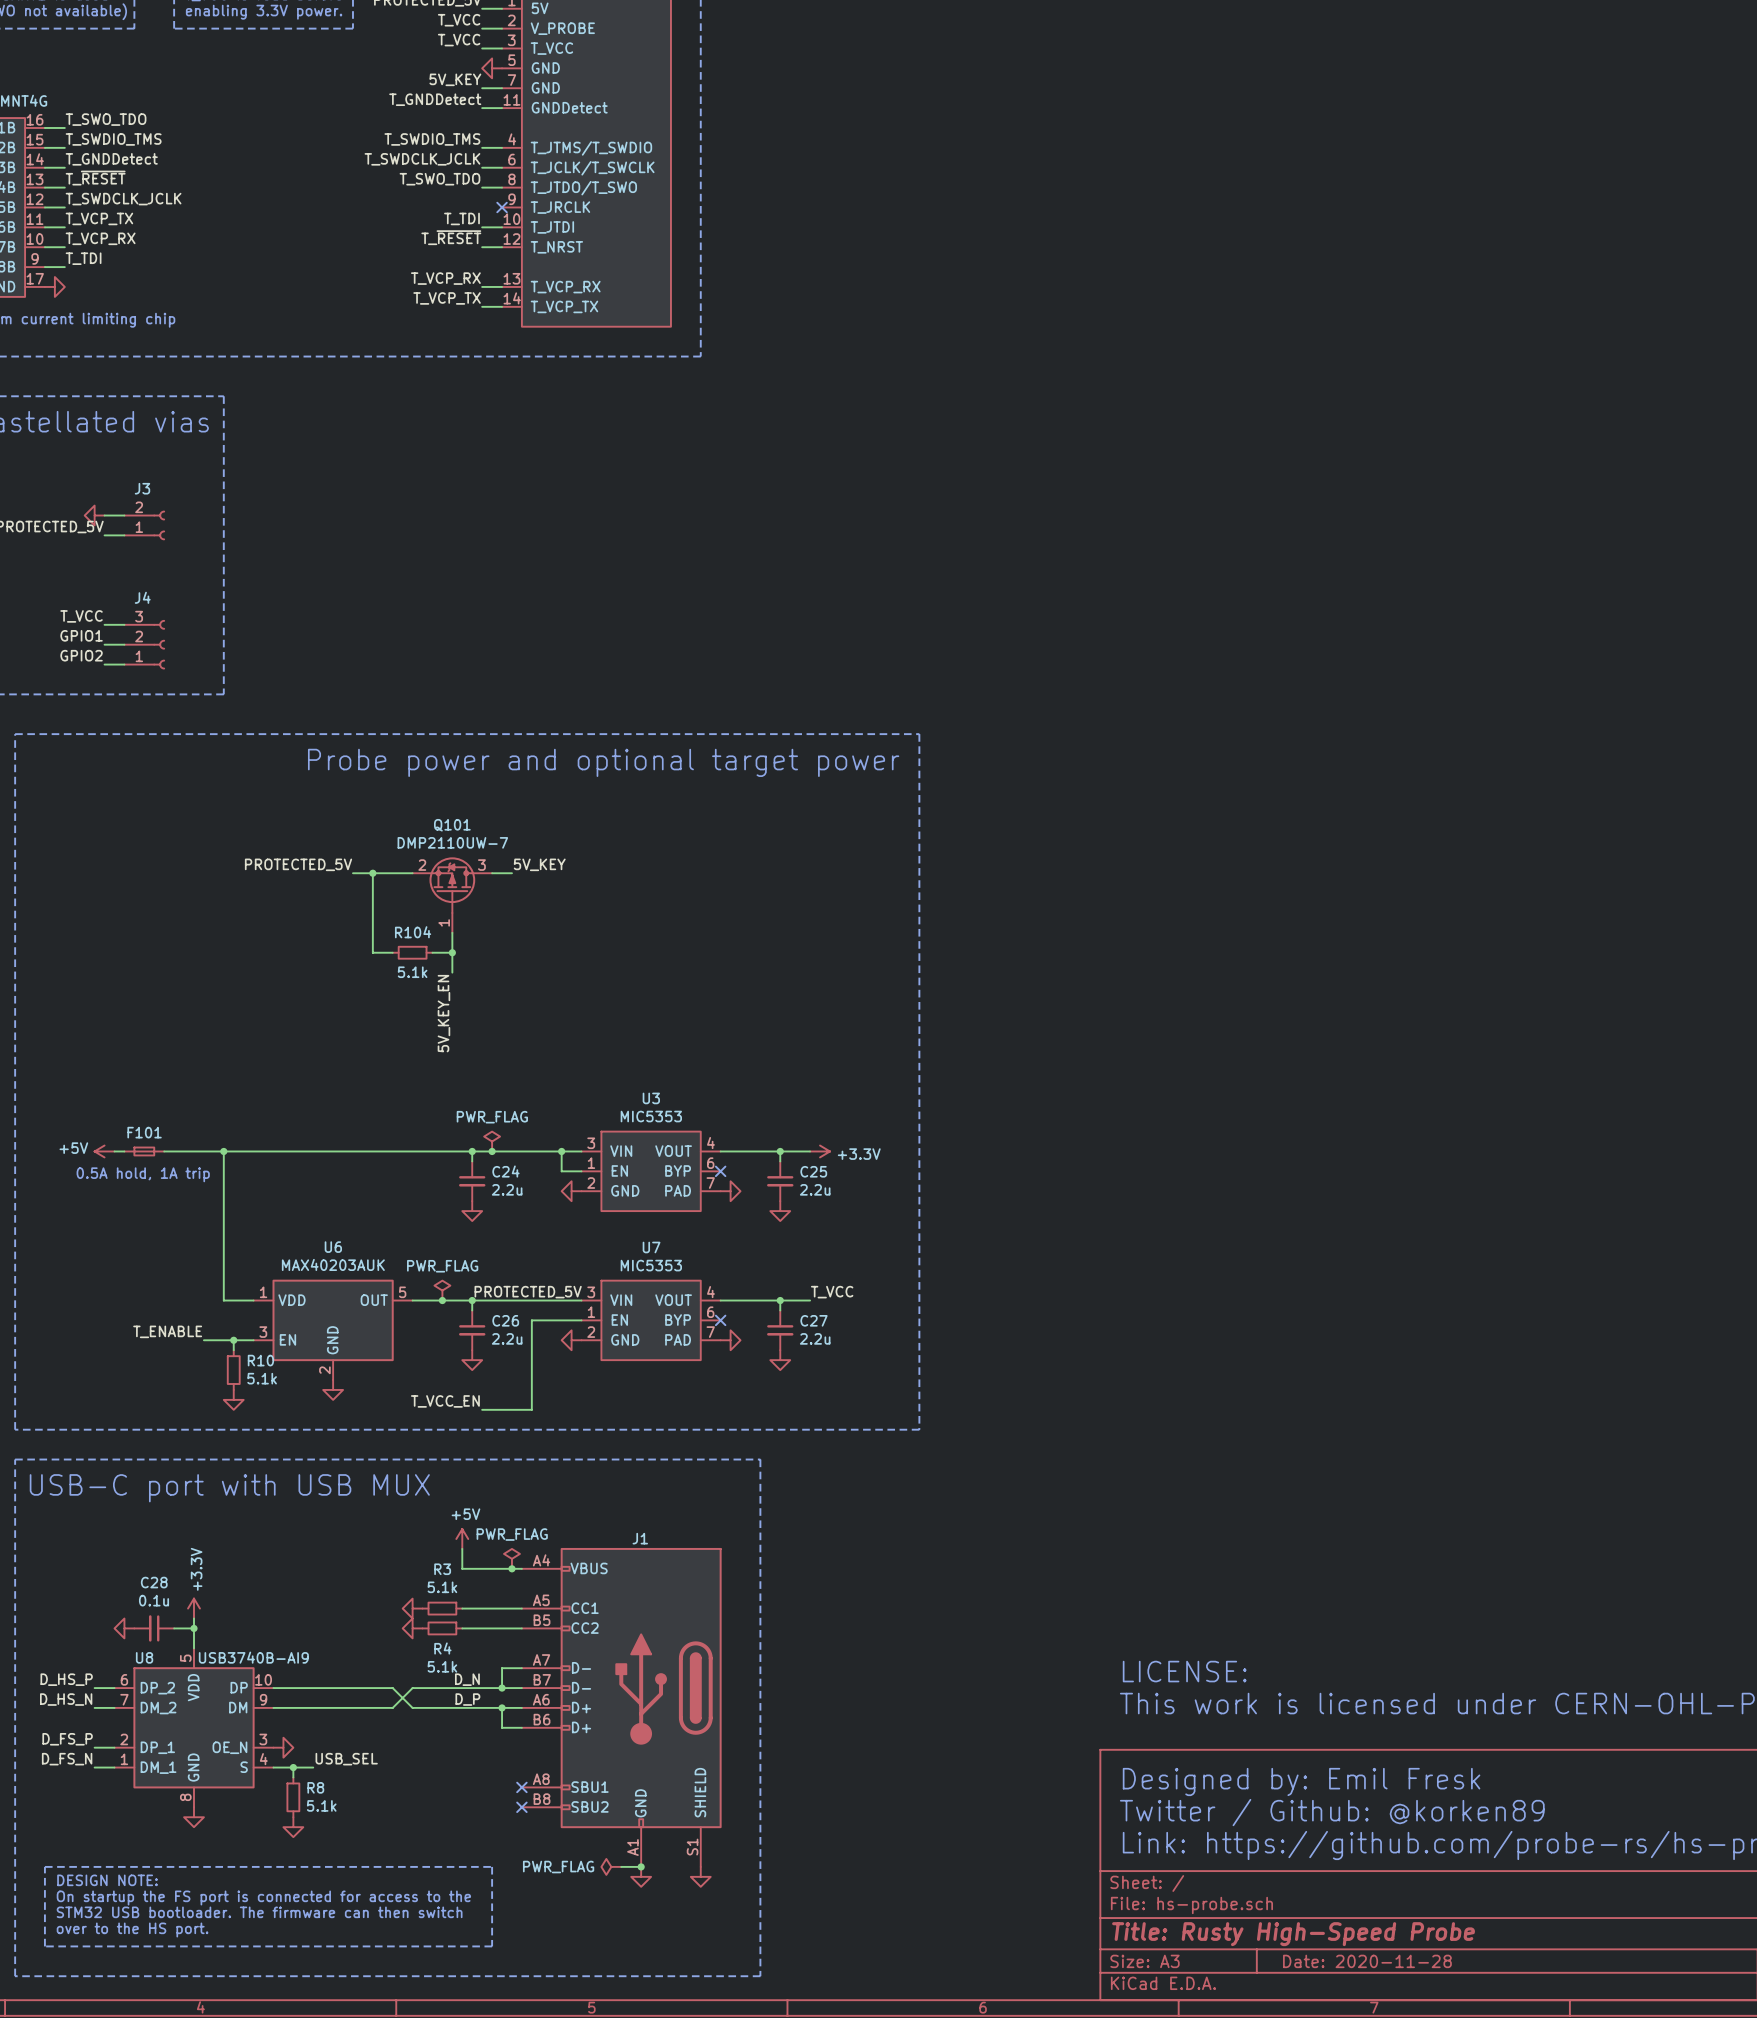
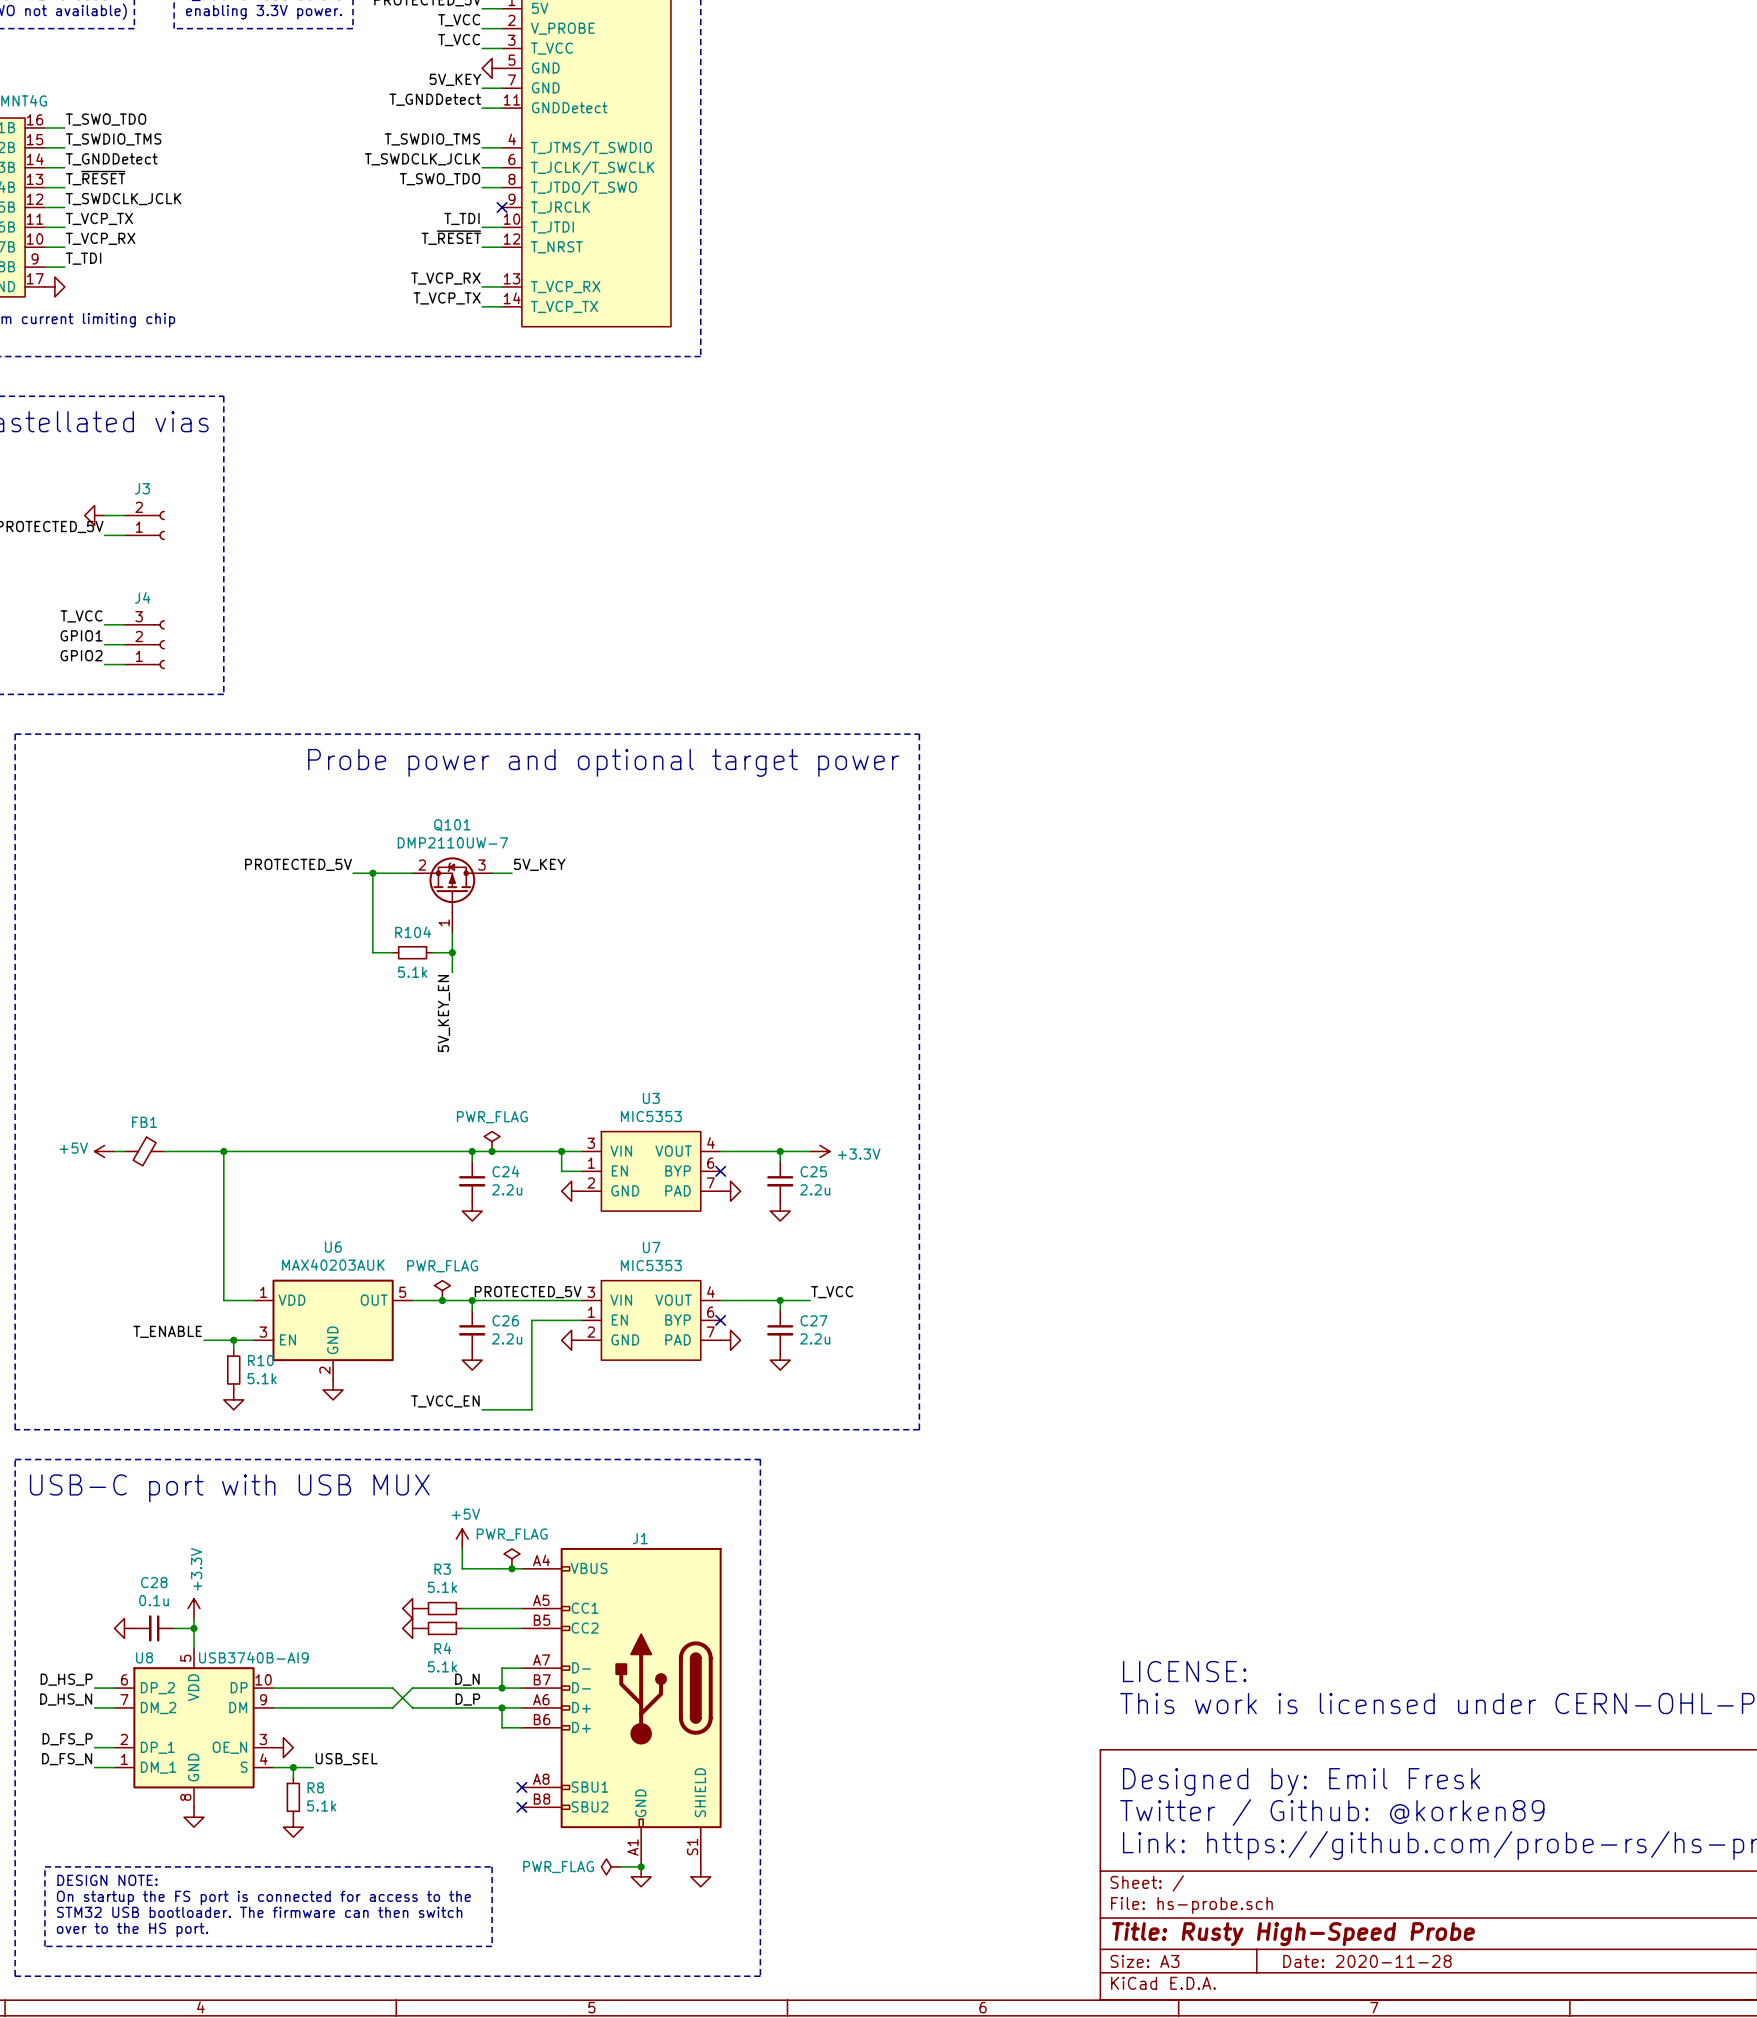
F101: (144, 1151) -> none
FB1: none -> (144, 1151)
text: 0.5A hold, 1A trip (143, 1174) -> none

